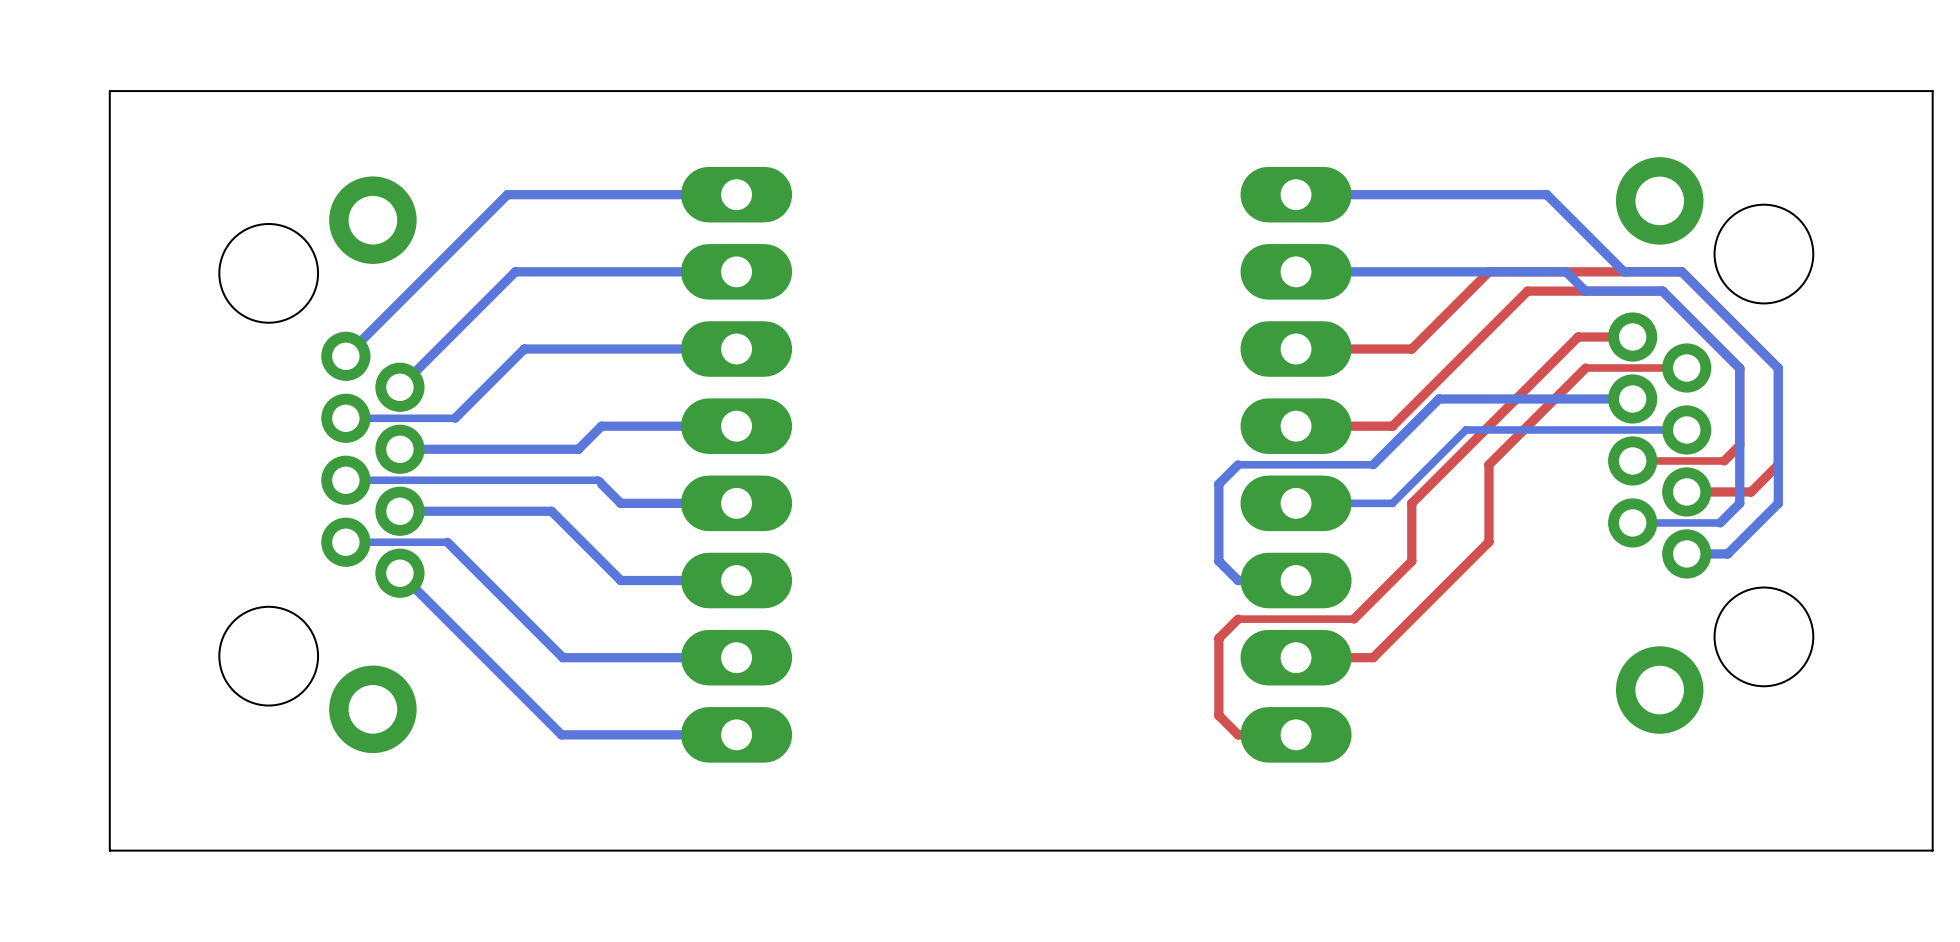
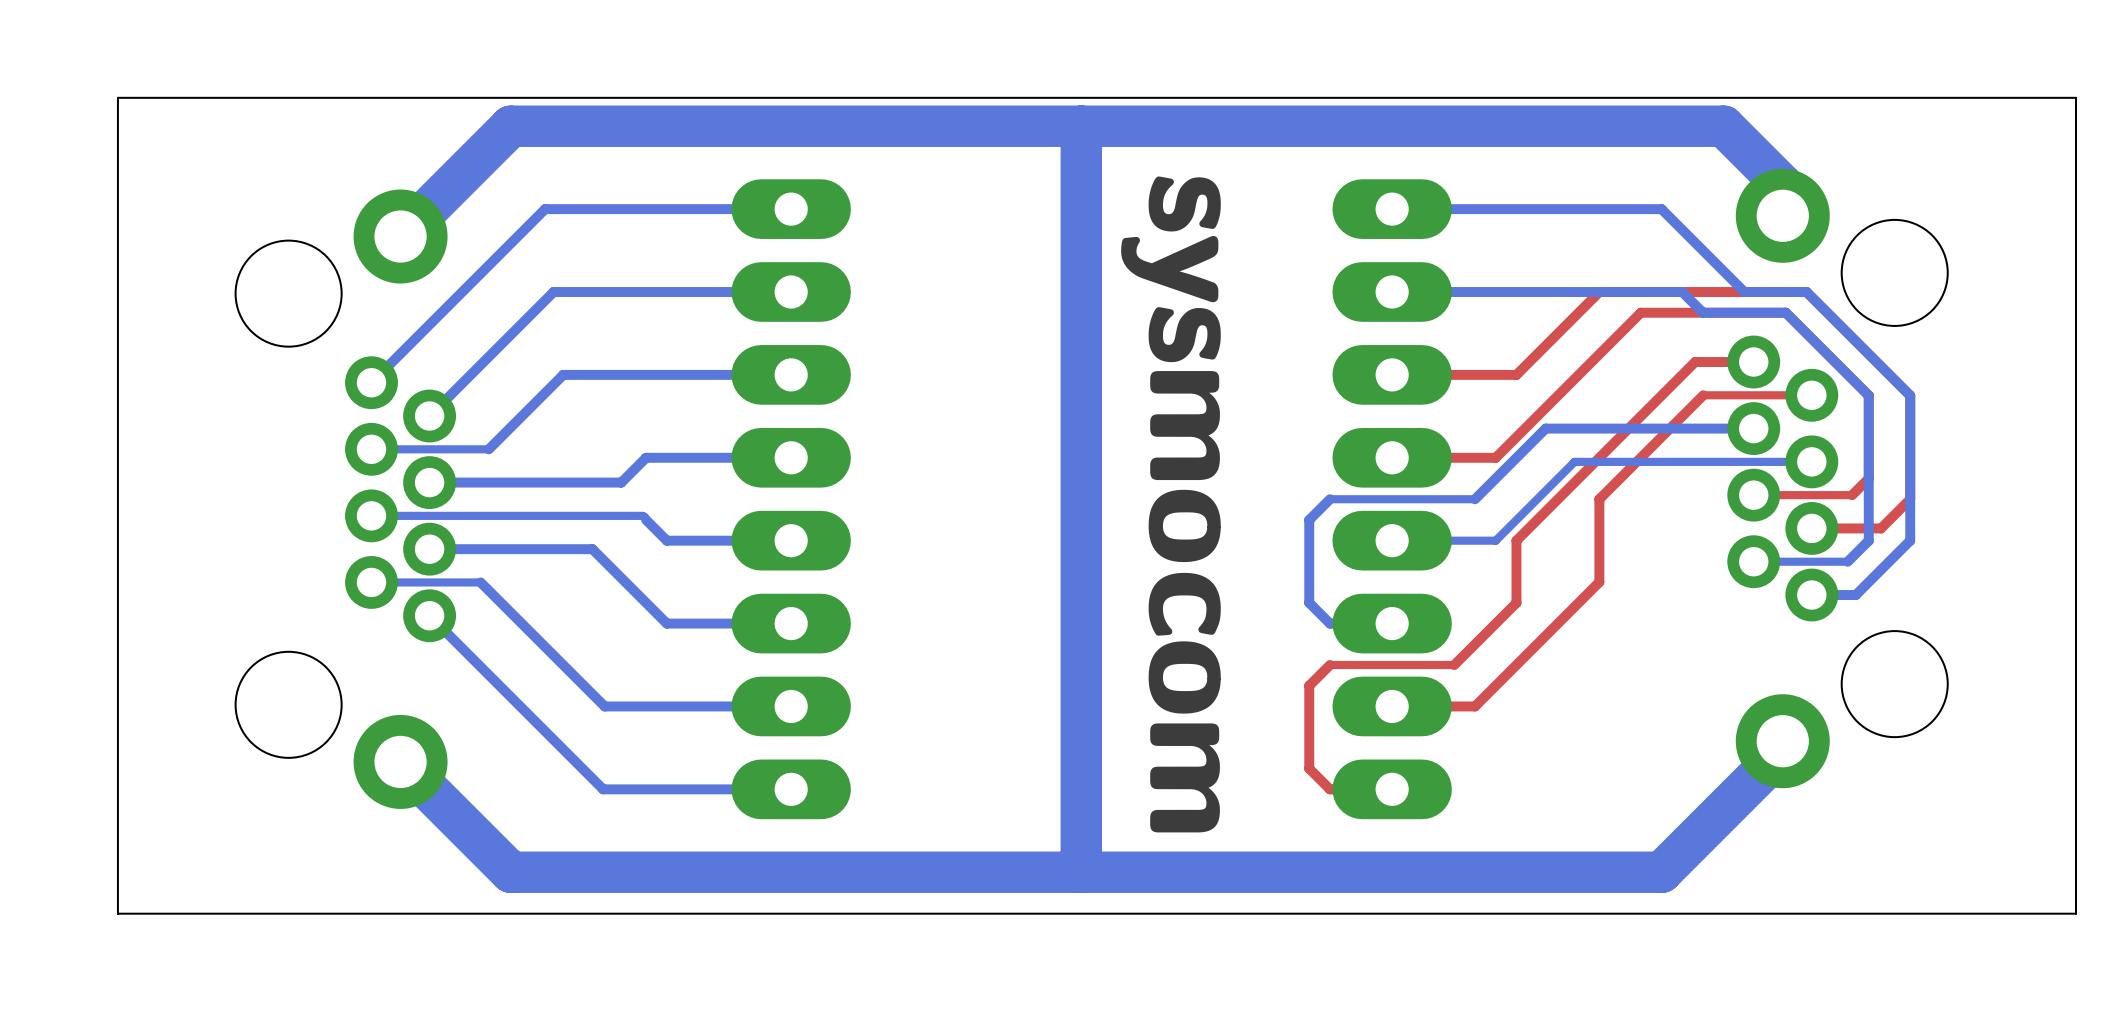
bottom track: none -> (1081, 126) (1081, 872)
drawing: none -> [1121, 176, 1221, 833]
bottom track: none -> (1782, 215) (1782, 185) (1723, 126) (510, 126) (400, 236)
bottom track: none -> (1782, 741) (1782, 751) (1661, 872) (510, 872) (400, 761)

